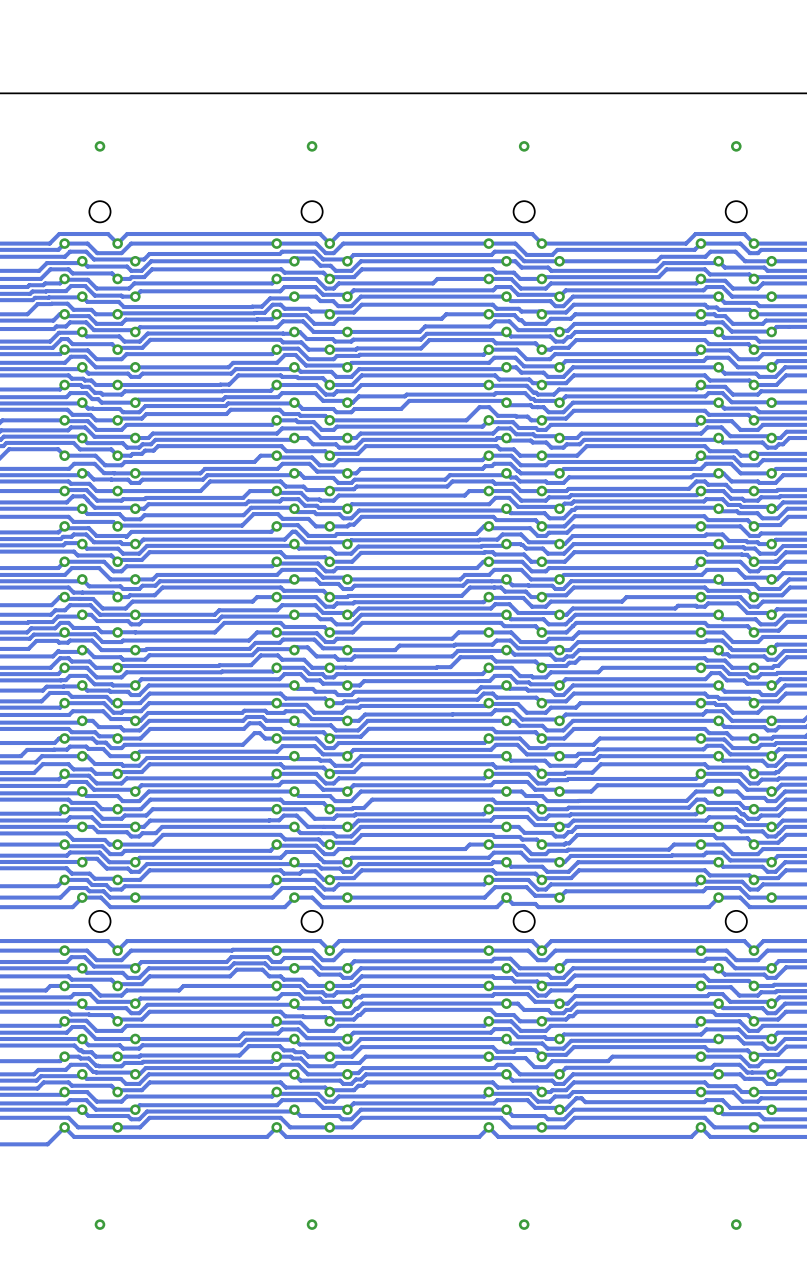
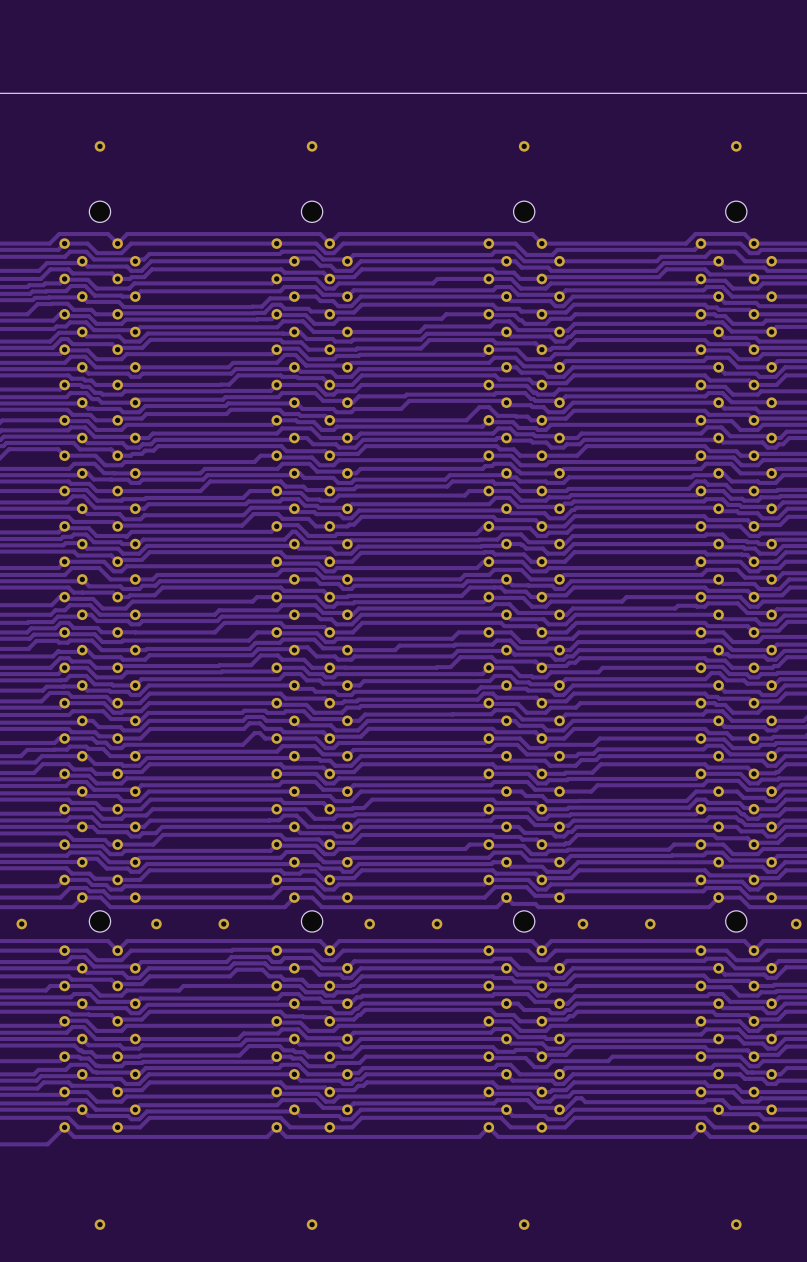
via: none -> (21, 924)
via: none -> (156, 924)
via: none -> (223, 924)
via: none -> (369, 924)
via: none -> (437, 924)
via: none -> (582, 924)
via: none -> (650, 924)
via: none -> (796, 924)

